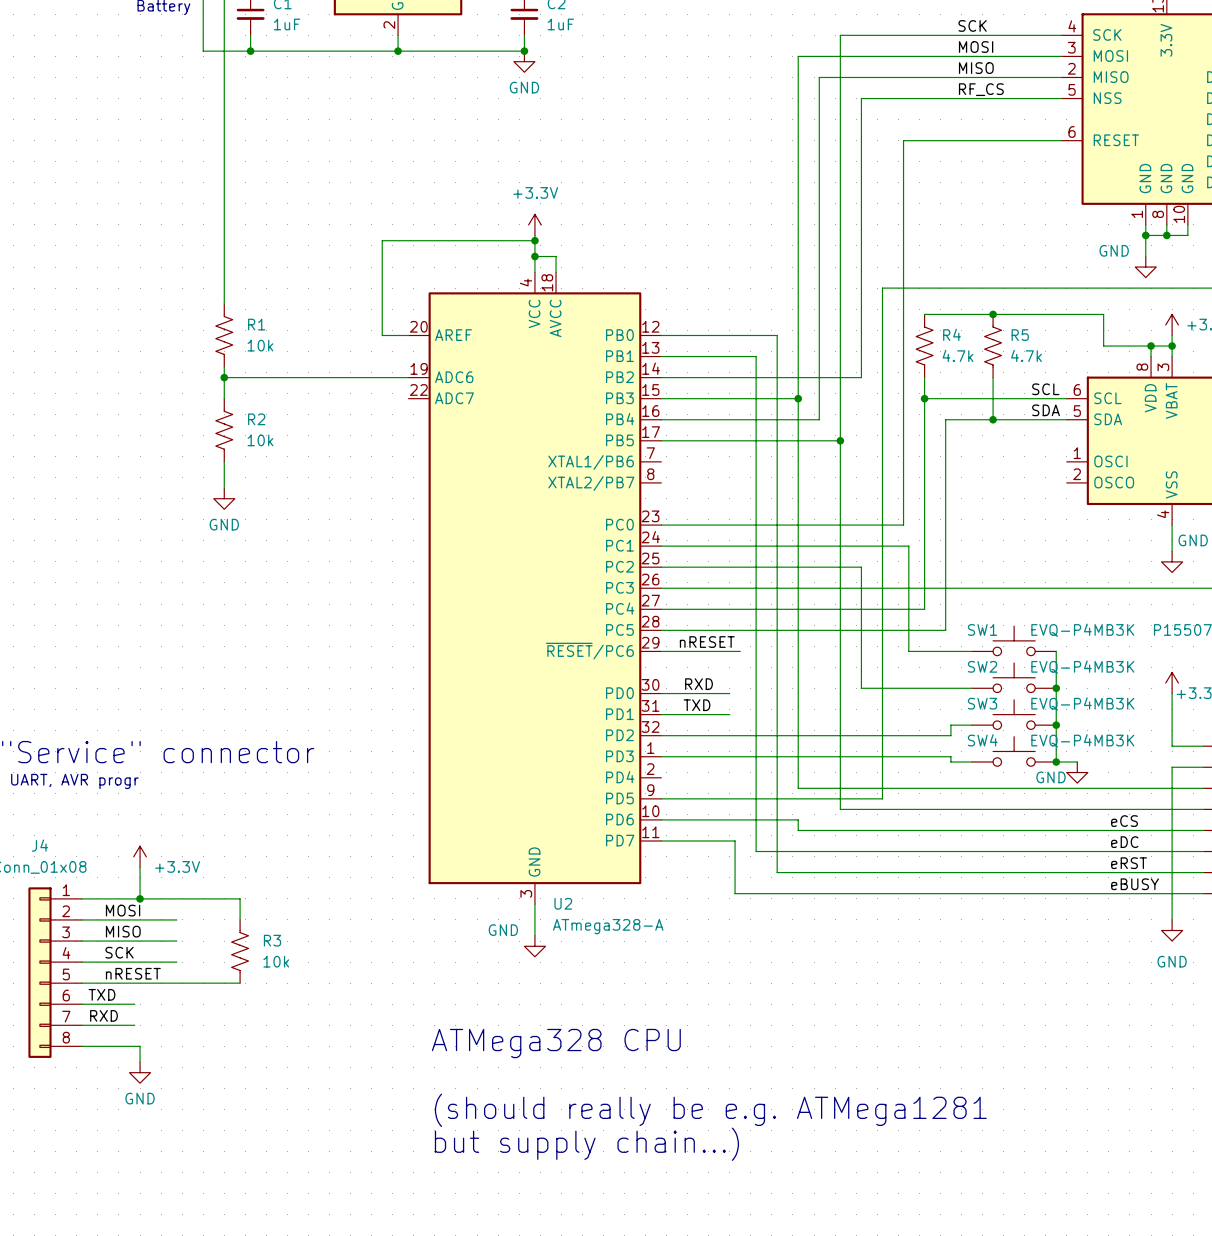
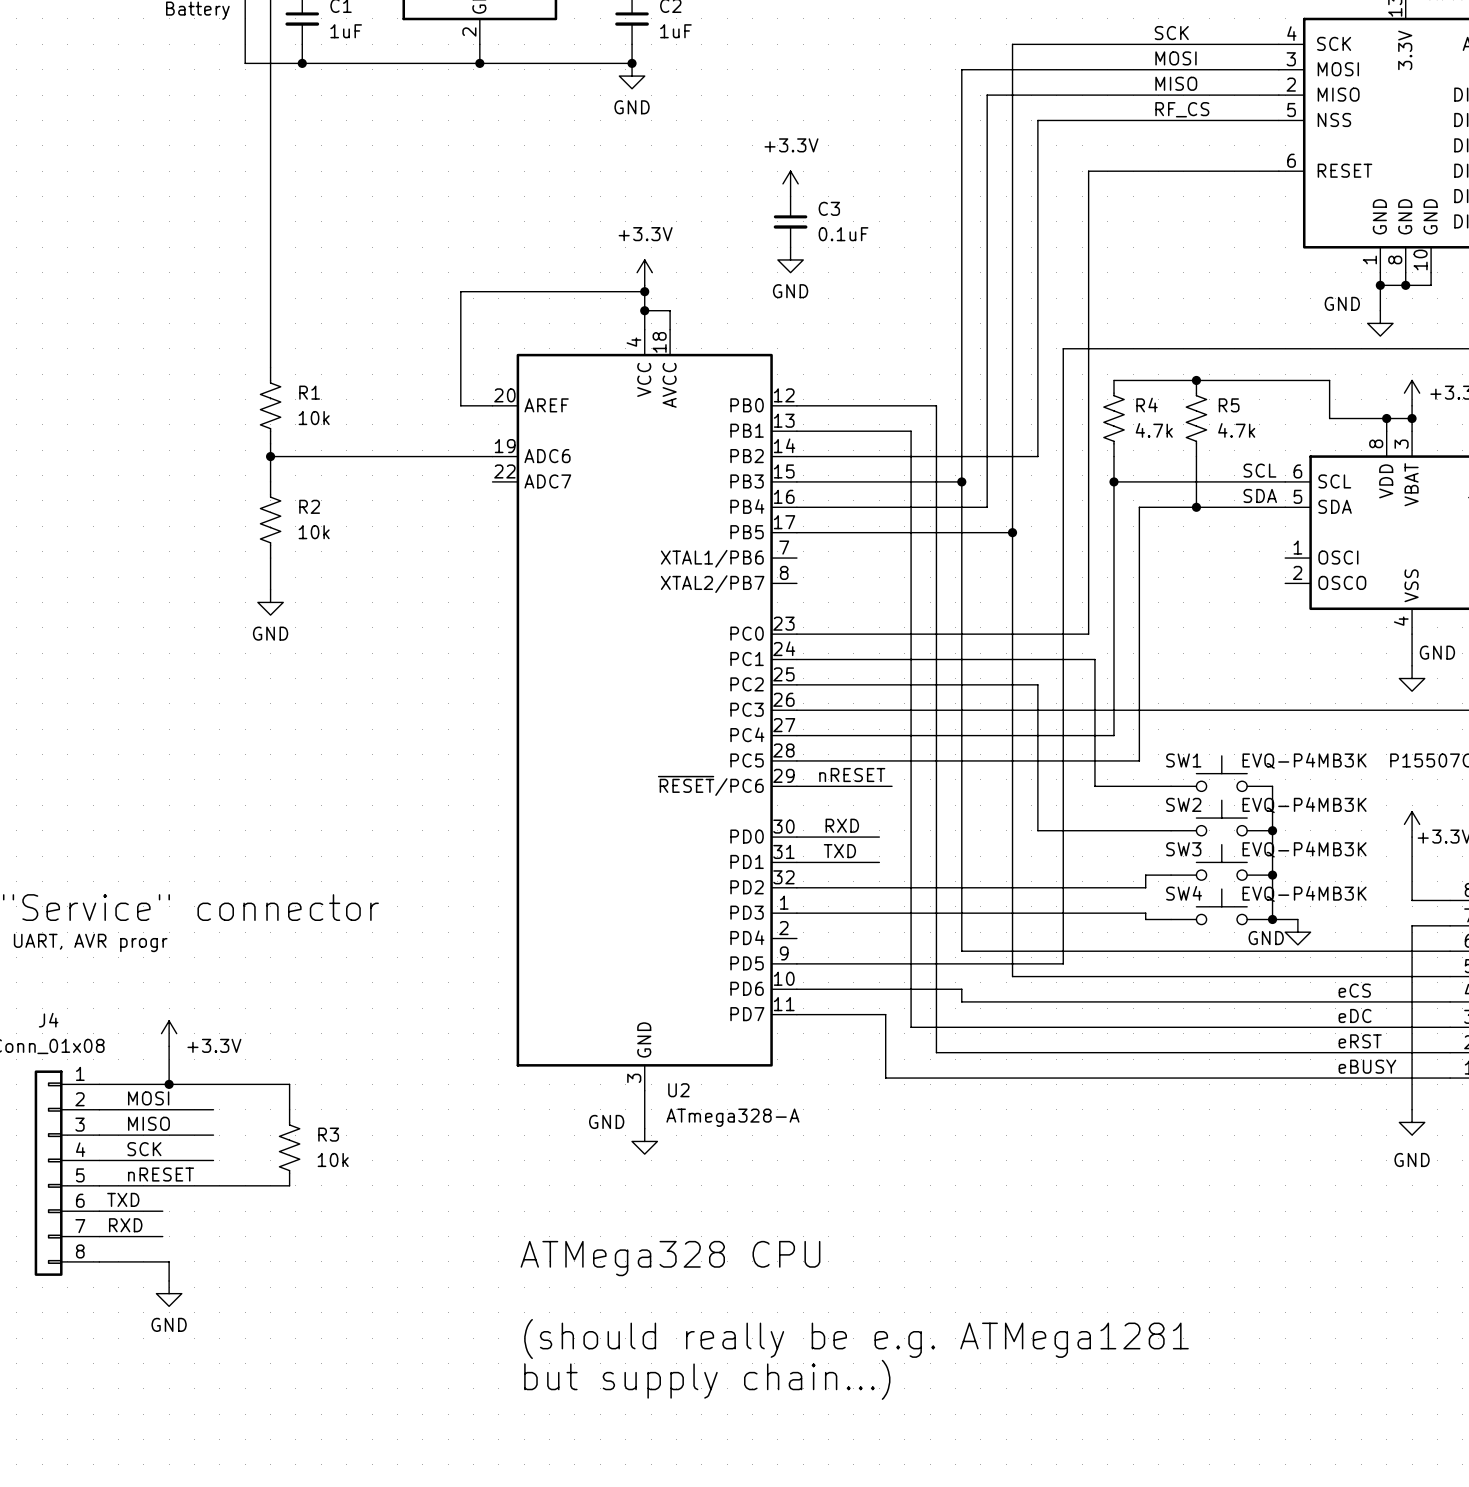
power symbol: none -> +3.3V (790, 183)
C3: none -> 0.1uF (790, 221)
power symbol: none -> GND (790, 259)

